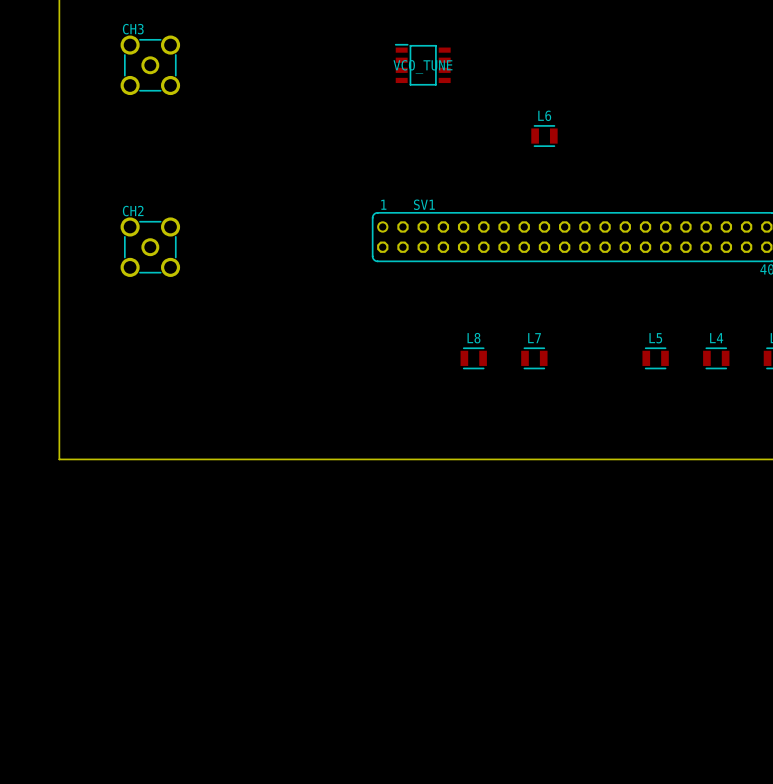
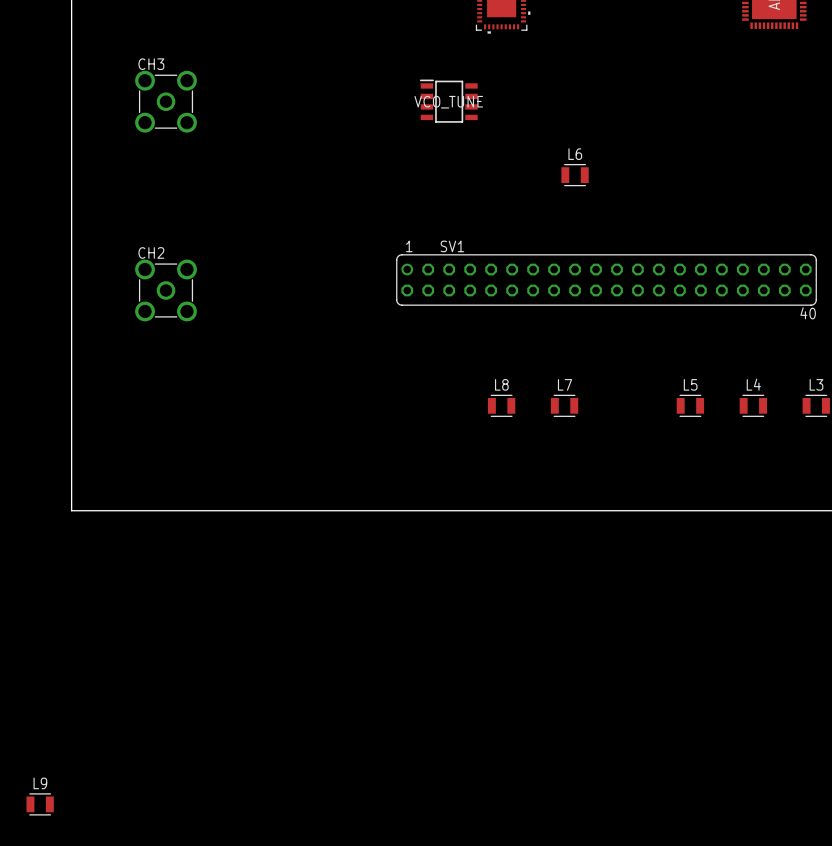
L9: none -> (40, 804)

